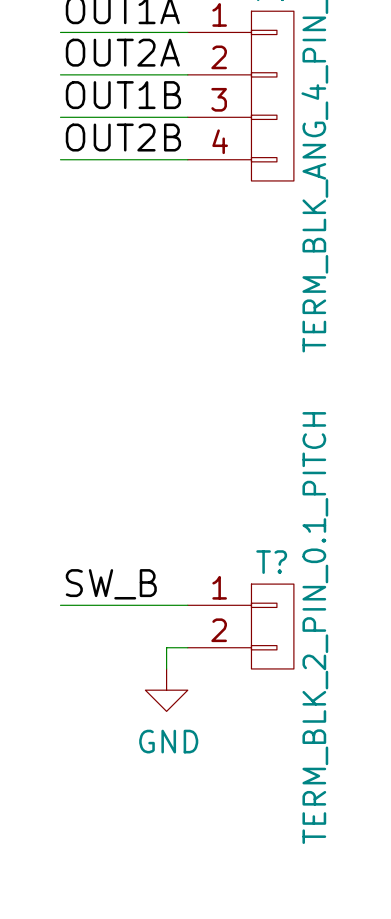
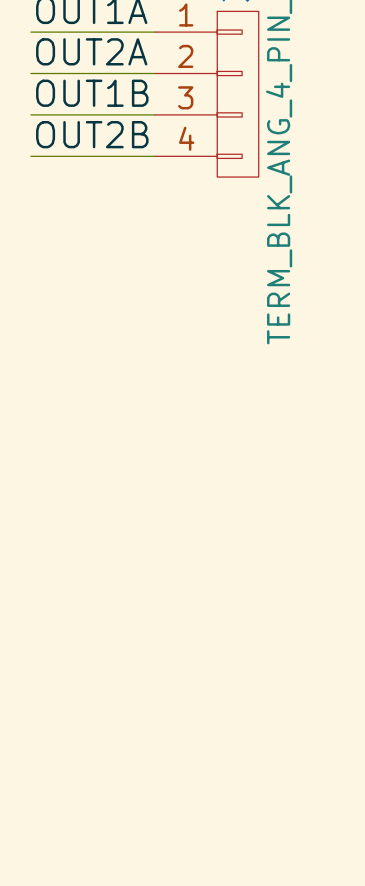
label: SW_B (111, 584) -> none
wire: (60, 605) (187, 605) -> none
T?: TERM_BLK_2_PIN_0.1_PITCH (240, 626) -> none
wire: (187, 647) (166, 647) (166, 668) -> none
power symbol: GND (166, 690) -> none

